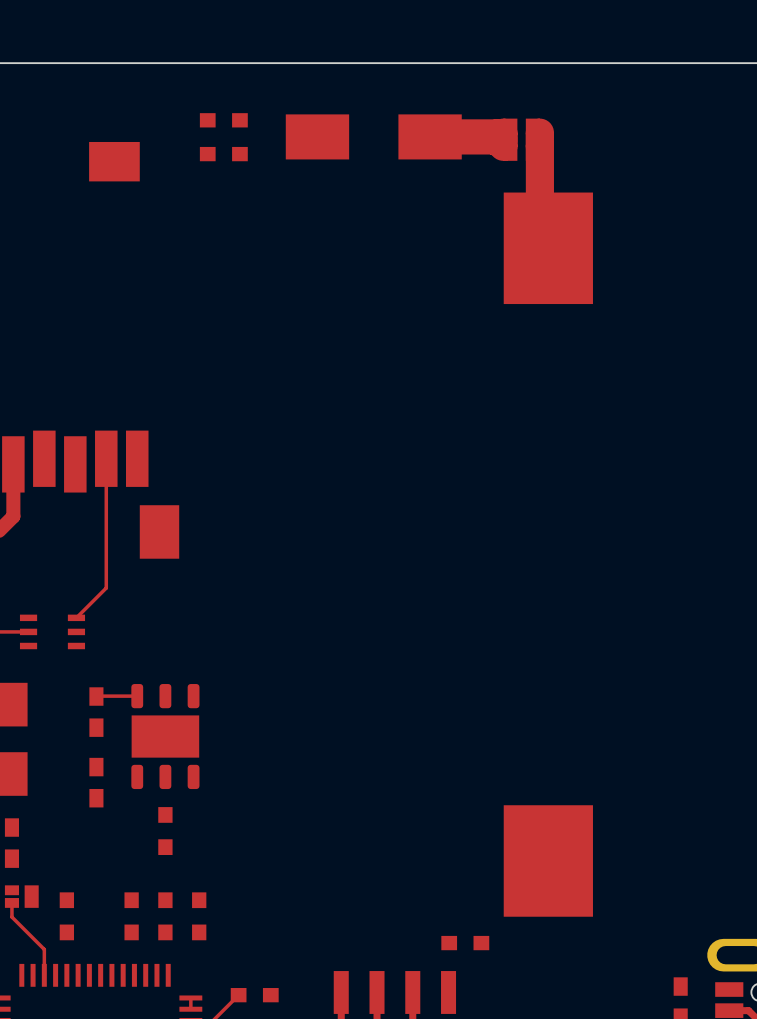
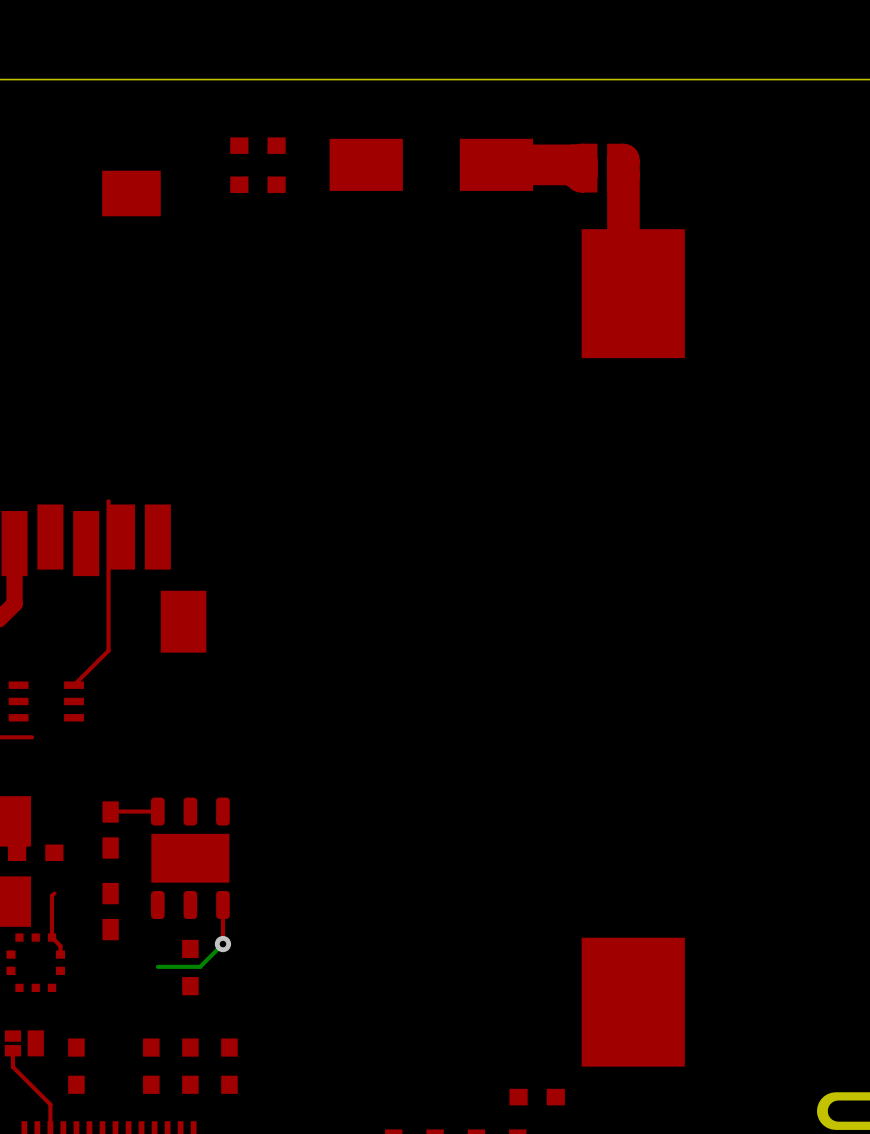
top track: (106, 458) (106, 588) (76, 617) -> (108, 501) (108, 650) (74, 685)
part position: (52, 631) -> (46, 701)
part: none -> (35, 852)
top track: none -> (54, 893) (52, 895) (52, 937) (60, 946) (60, 954)
top track: none -> (222, 904) (222, 944)
bottom track: none -> (222, 944) (200, 966) (157, 966)
via: none -> (222, 944)
part footprint: [4, 818, 19, 868] -> [6, 933, 66, 993]

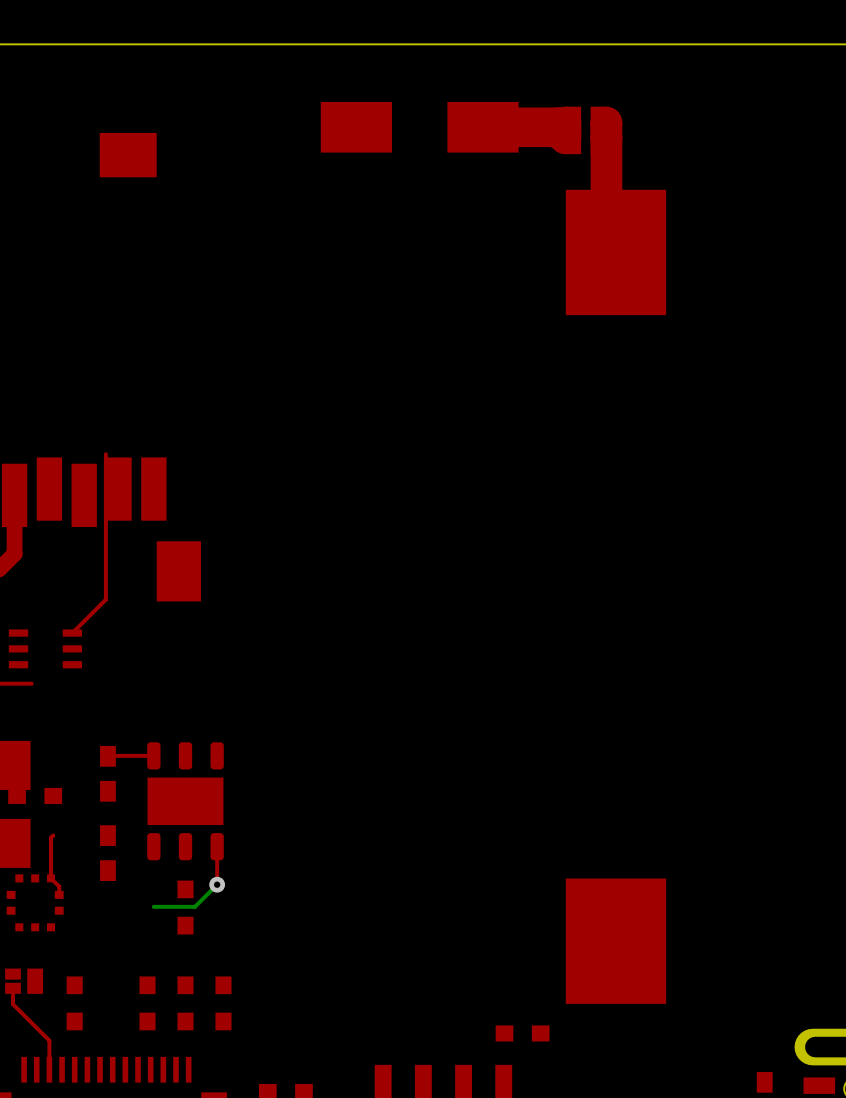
part: (257, 145) -> none
part: (257, 184) -> none

